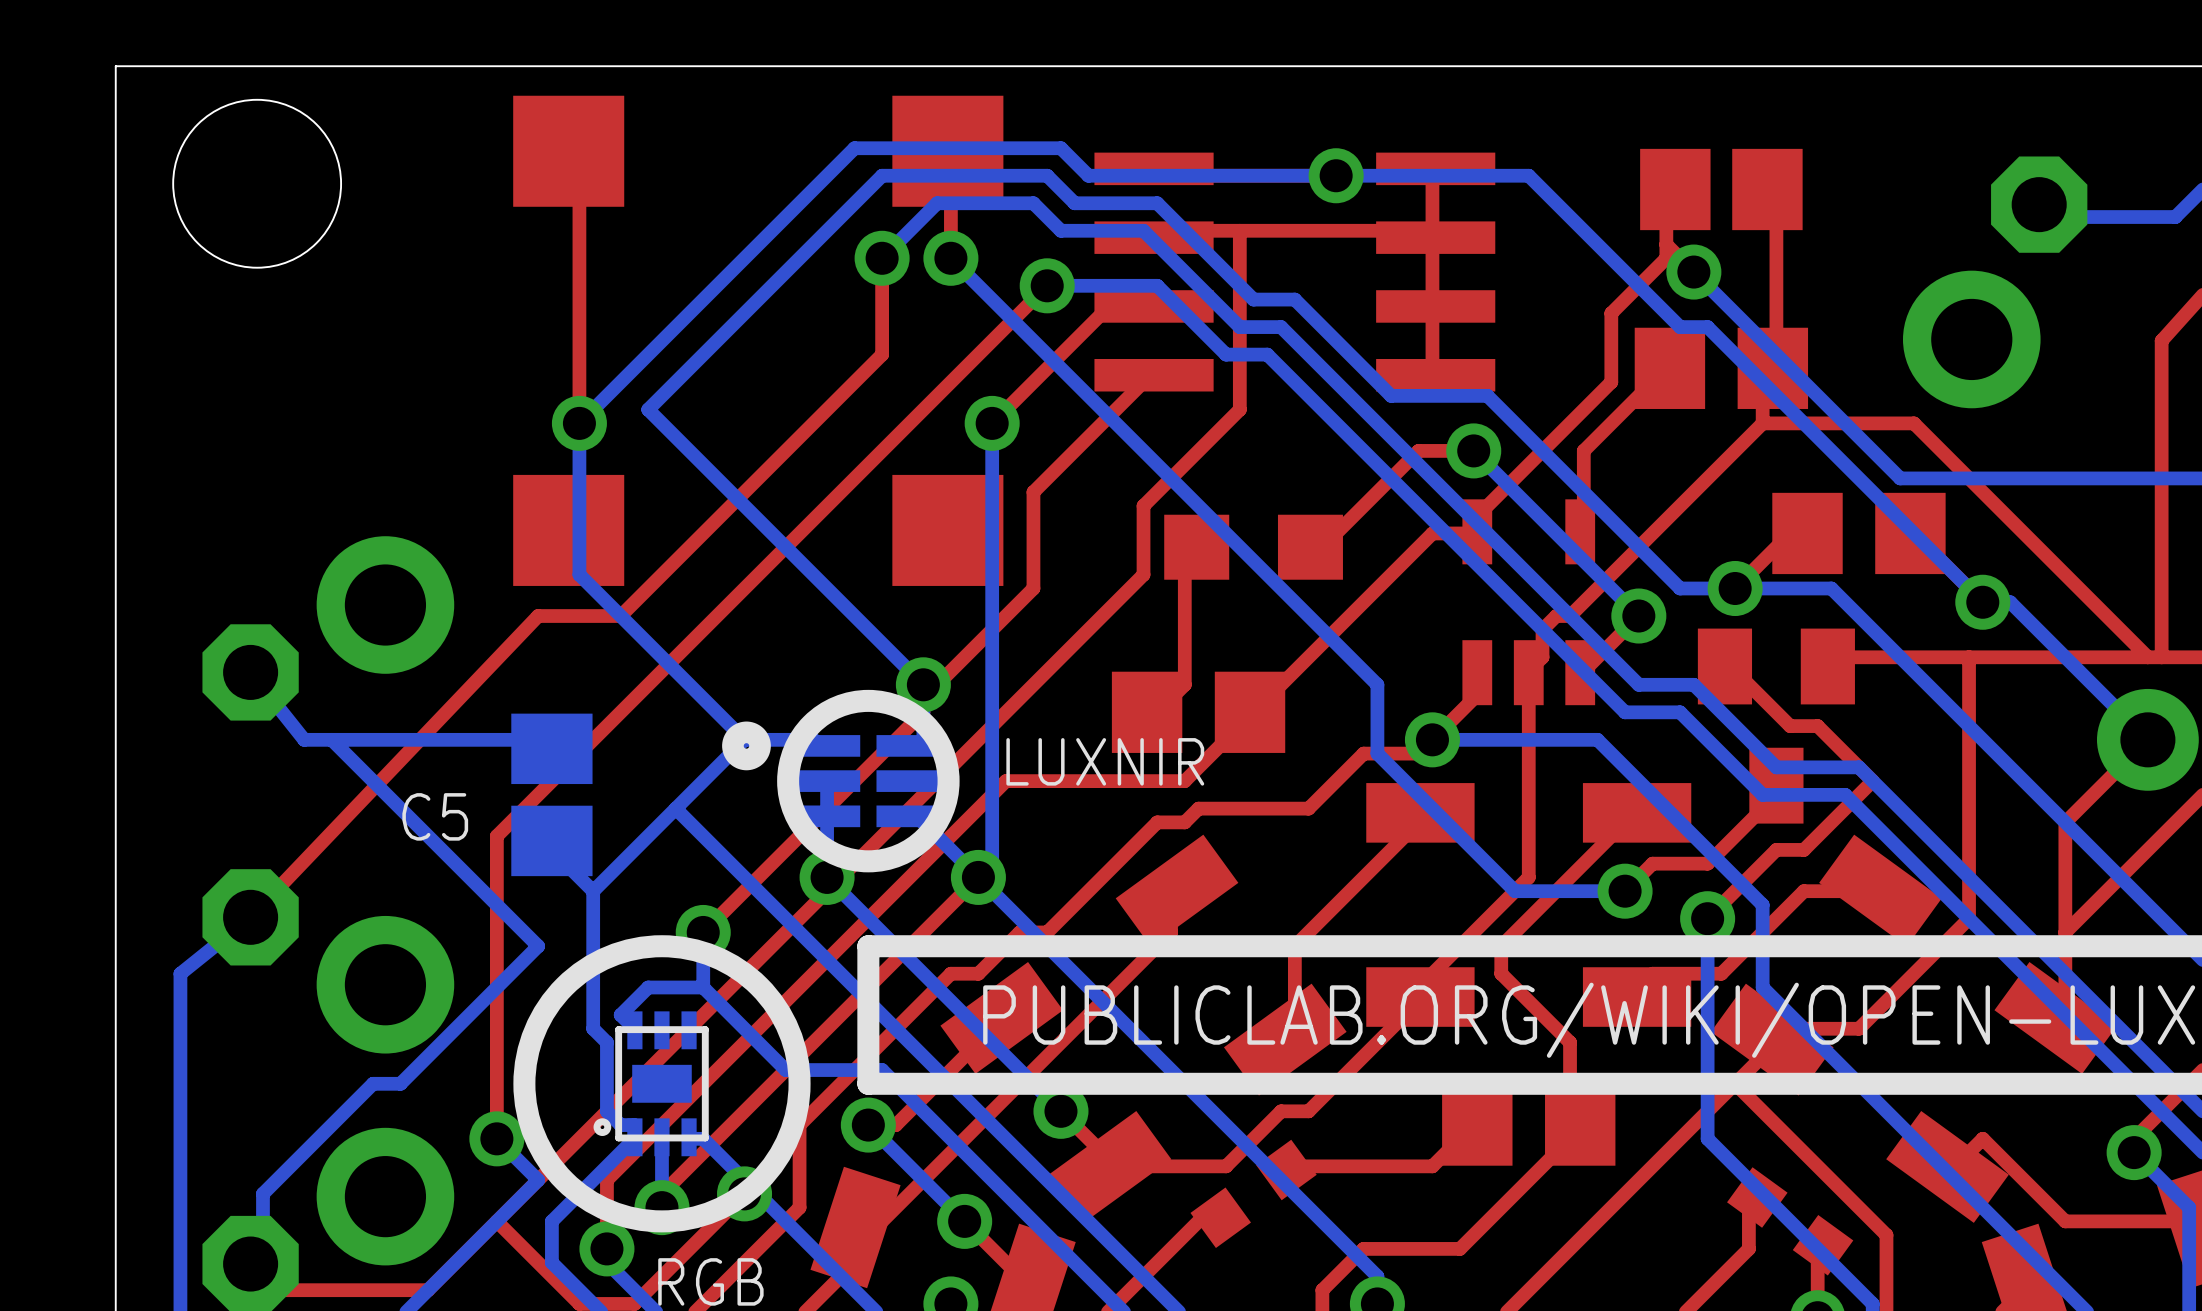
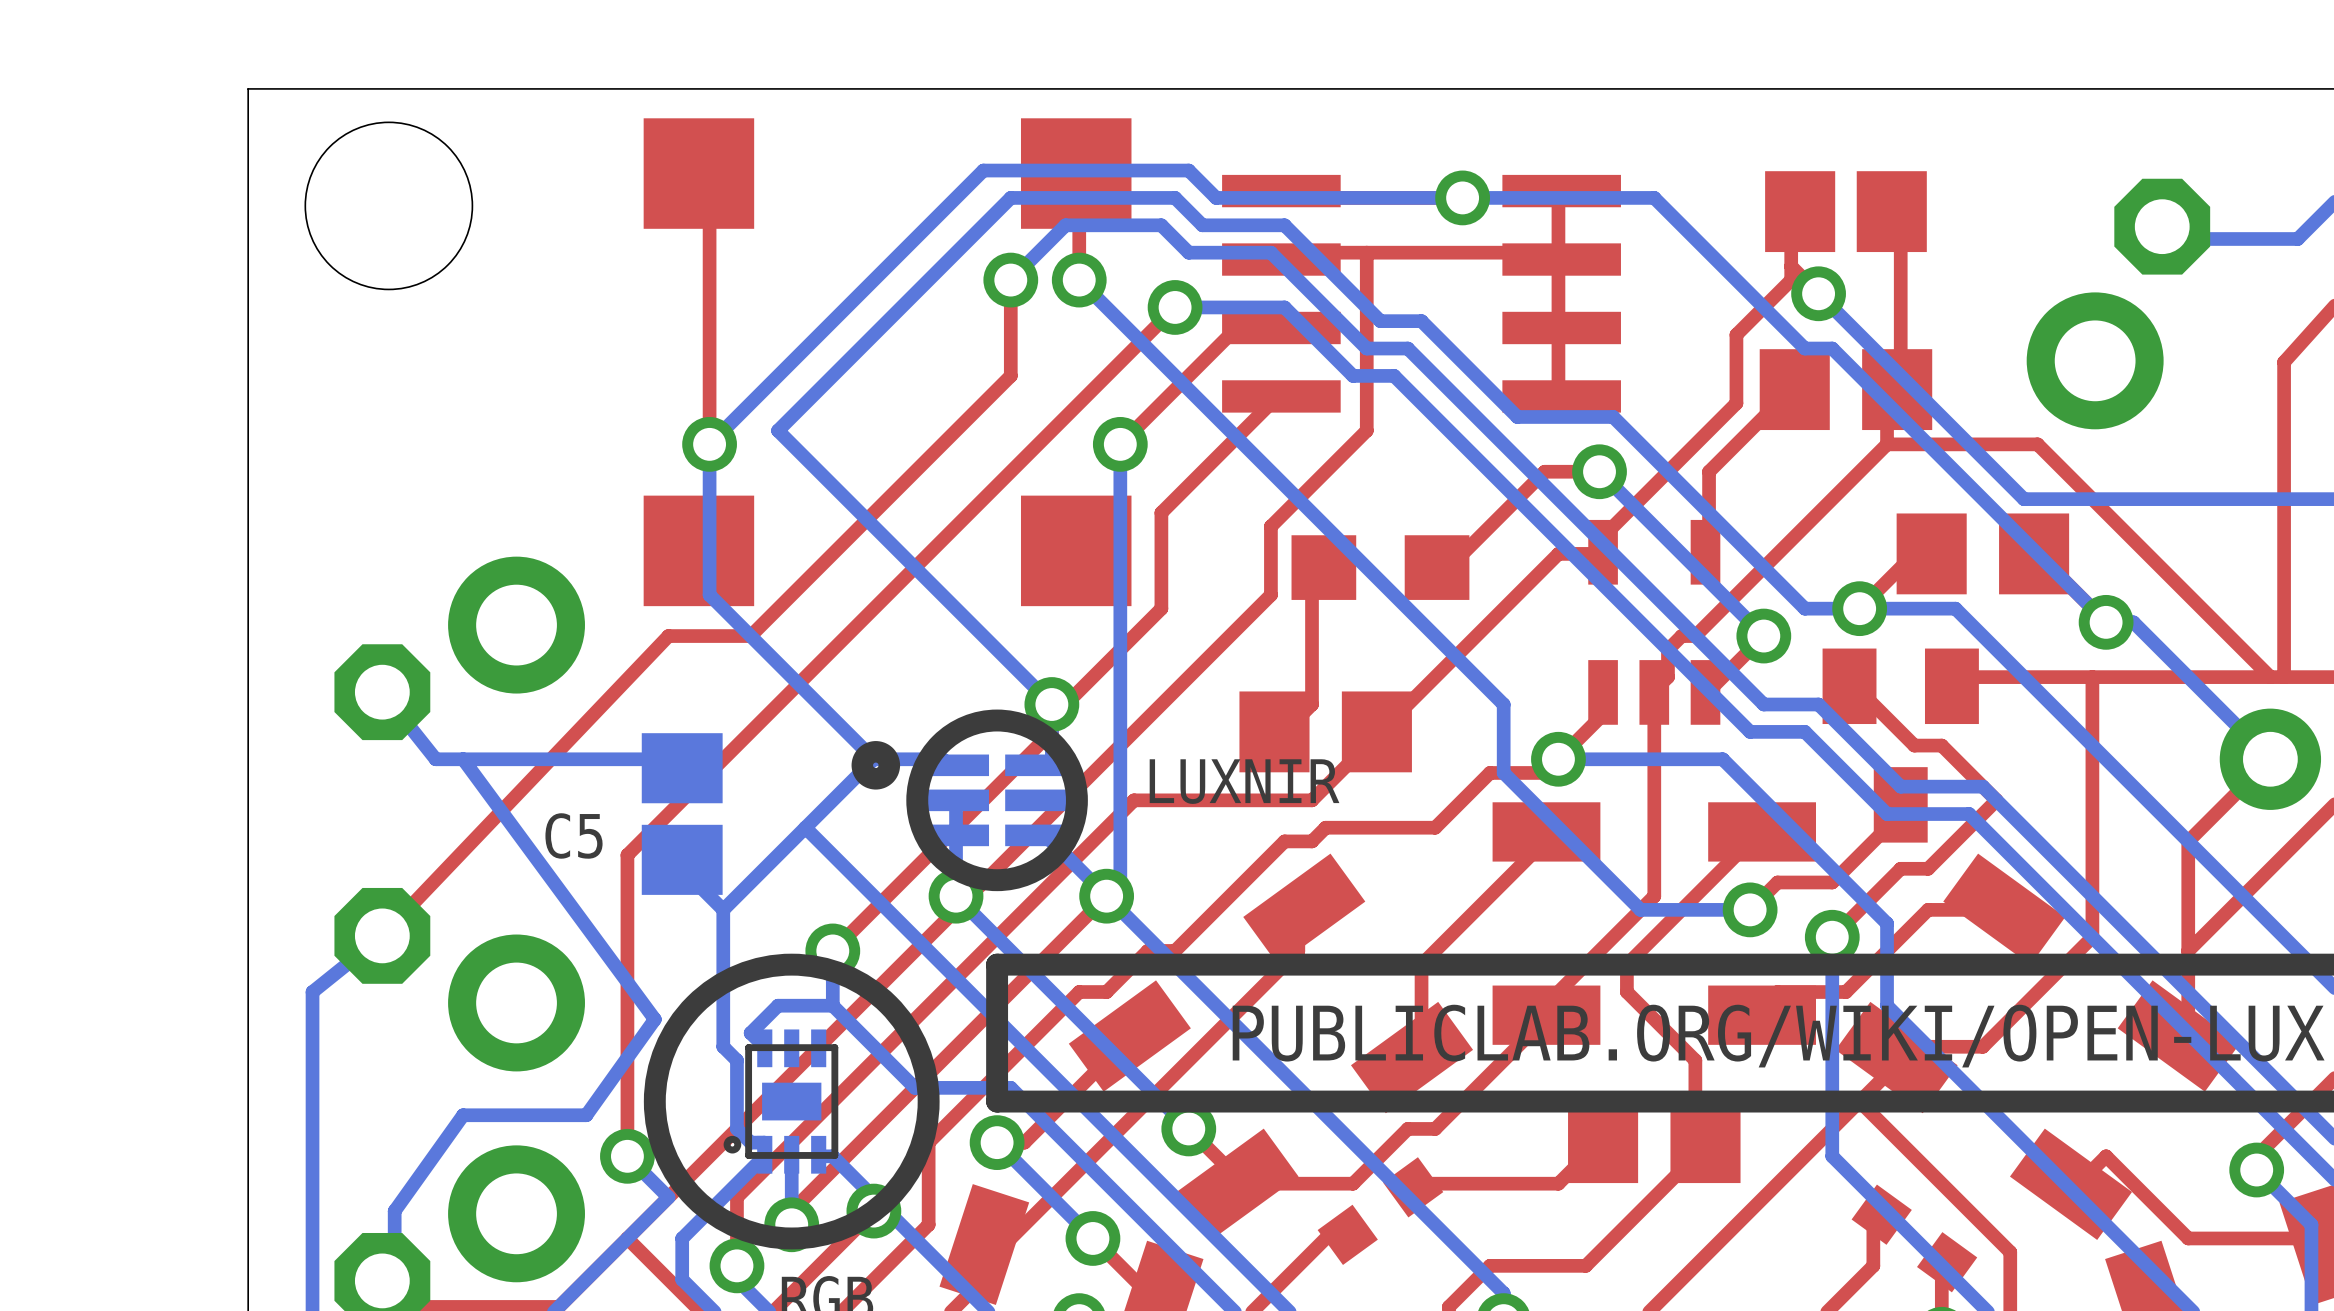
bottom track: (331, 739) (538, 946) (400, 1083) (373, 1083) (262, 1193) -> (463, 759) (654, 1019) (586, 1115) (463, 1115) (394, 1211)

